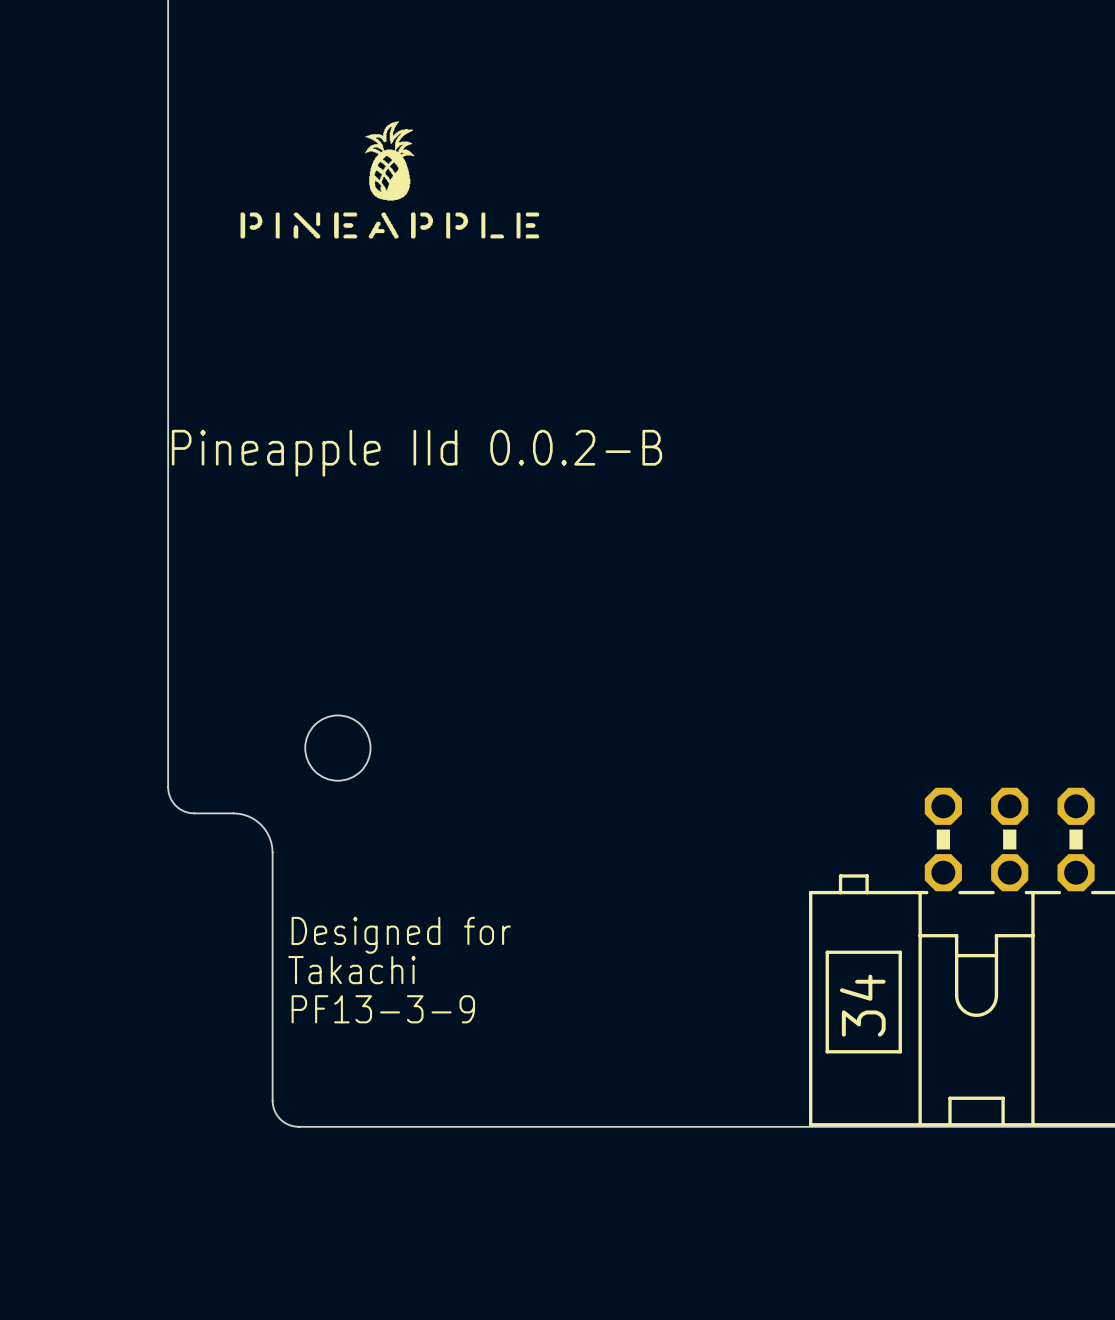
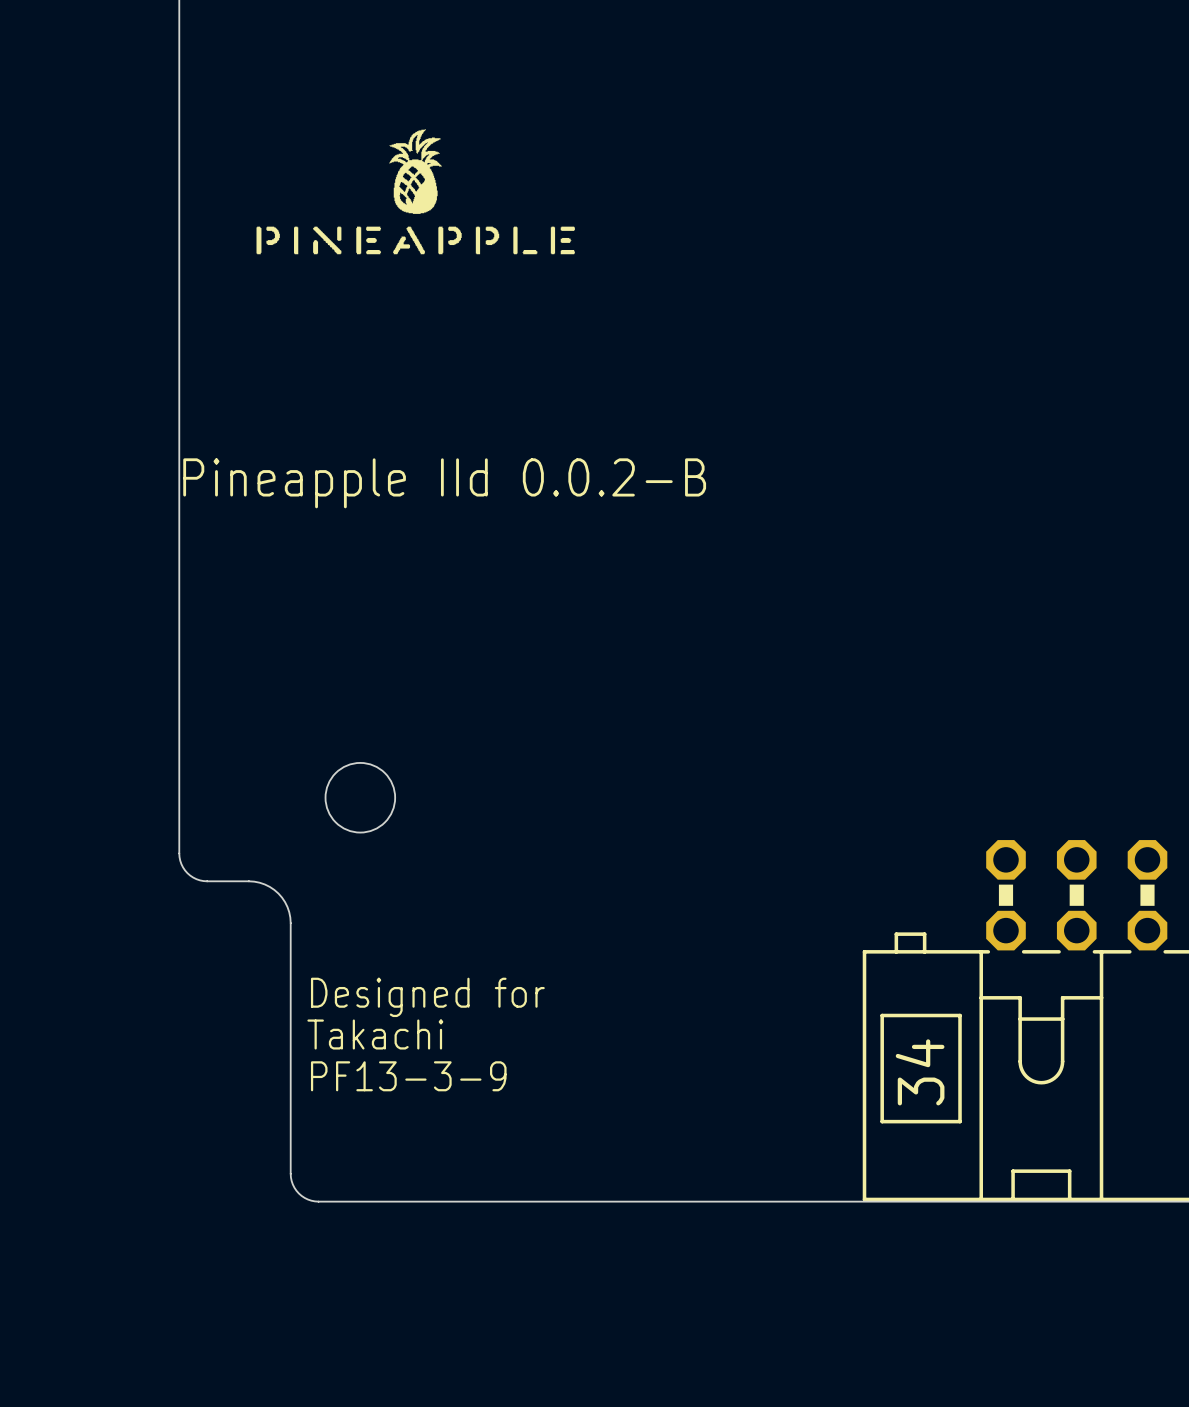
board edge: (168, 787) (173, 803) (184, 811) (194, 813) (238, 813) (257, 821) (269, 837) (272, 847) (272, 865) -> (179, 839) (180, 860) (190, 875) (203, 881) (248, 881) (264, 884) (278, 893) (285, 902) (290, 923)

